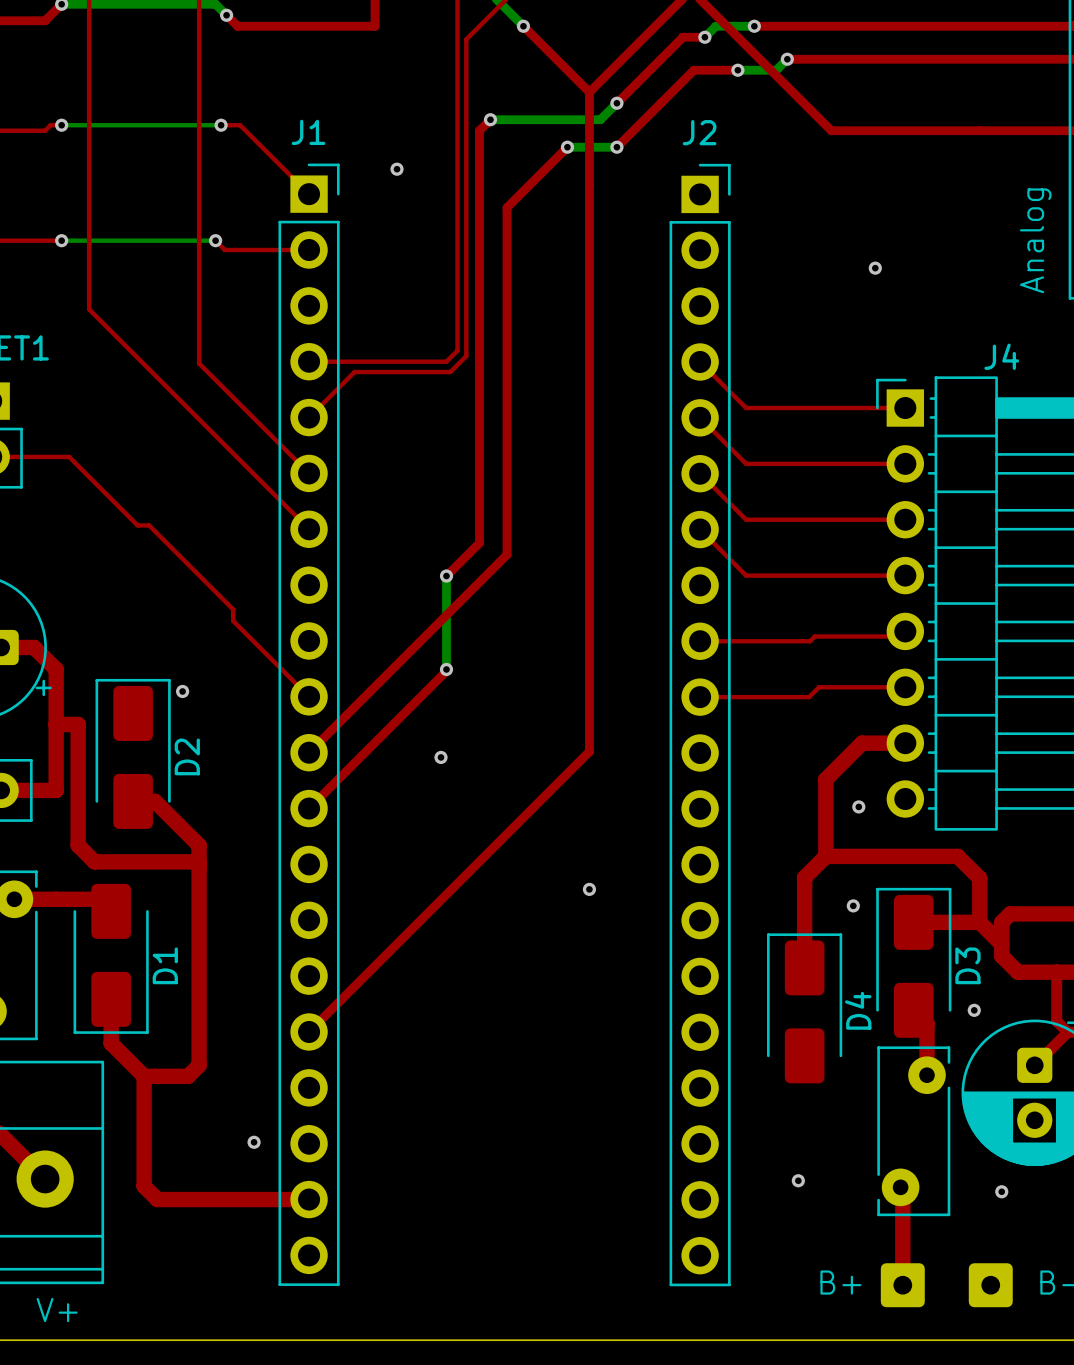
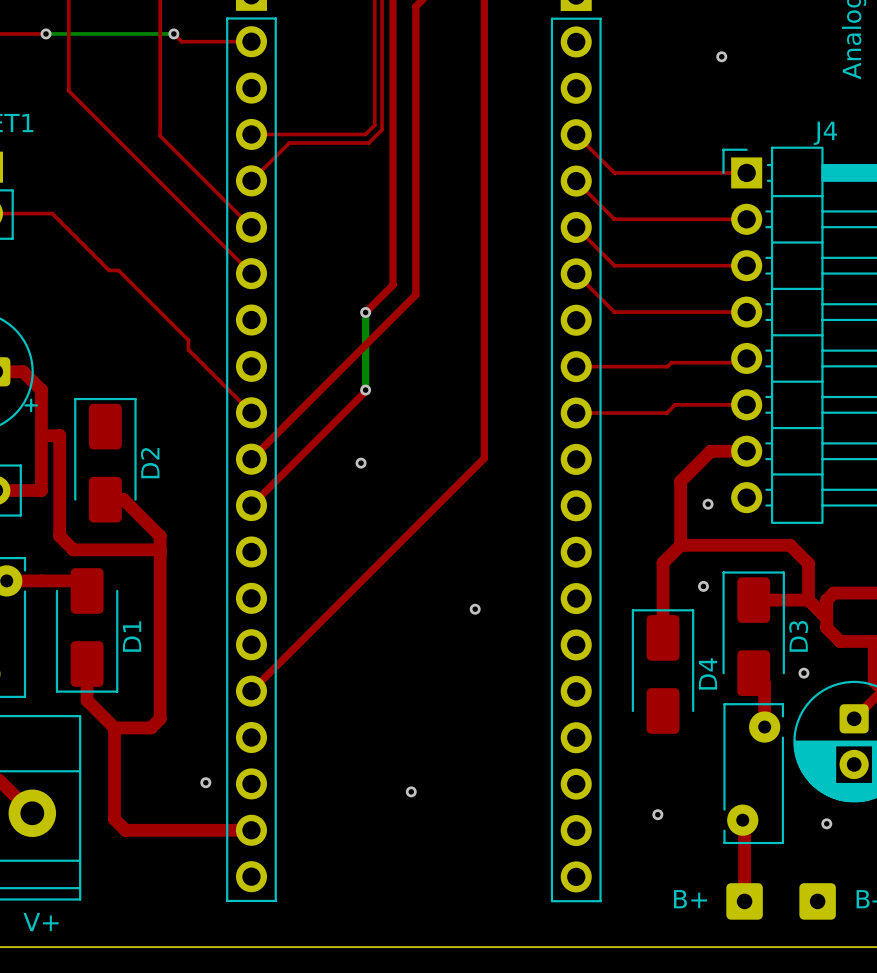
via: (182, 691) -> none
via position: (589, 889) -> (475, 609)
via: none -> (411, 791)

